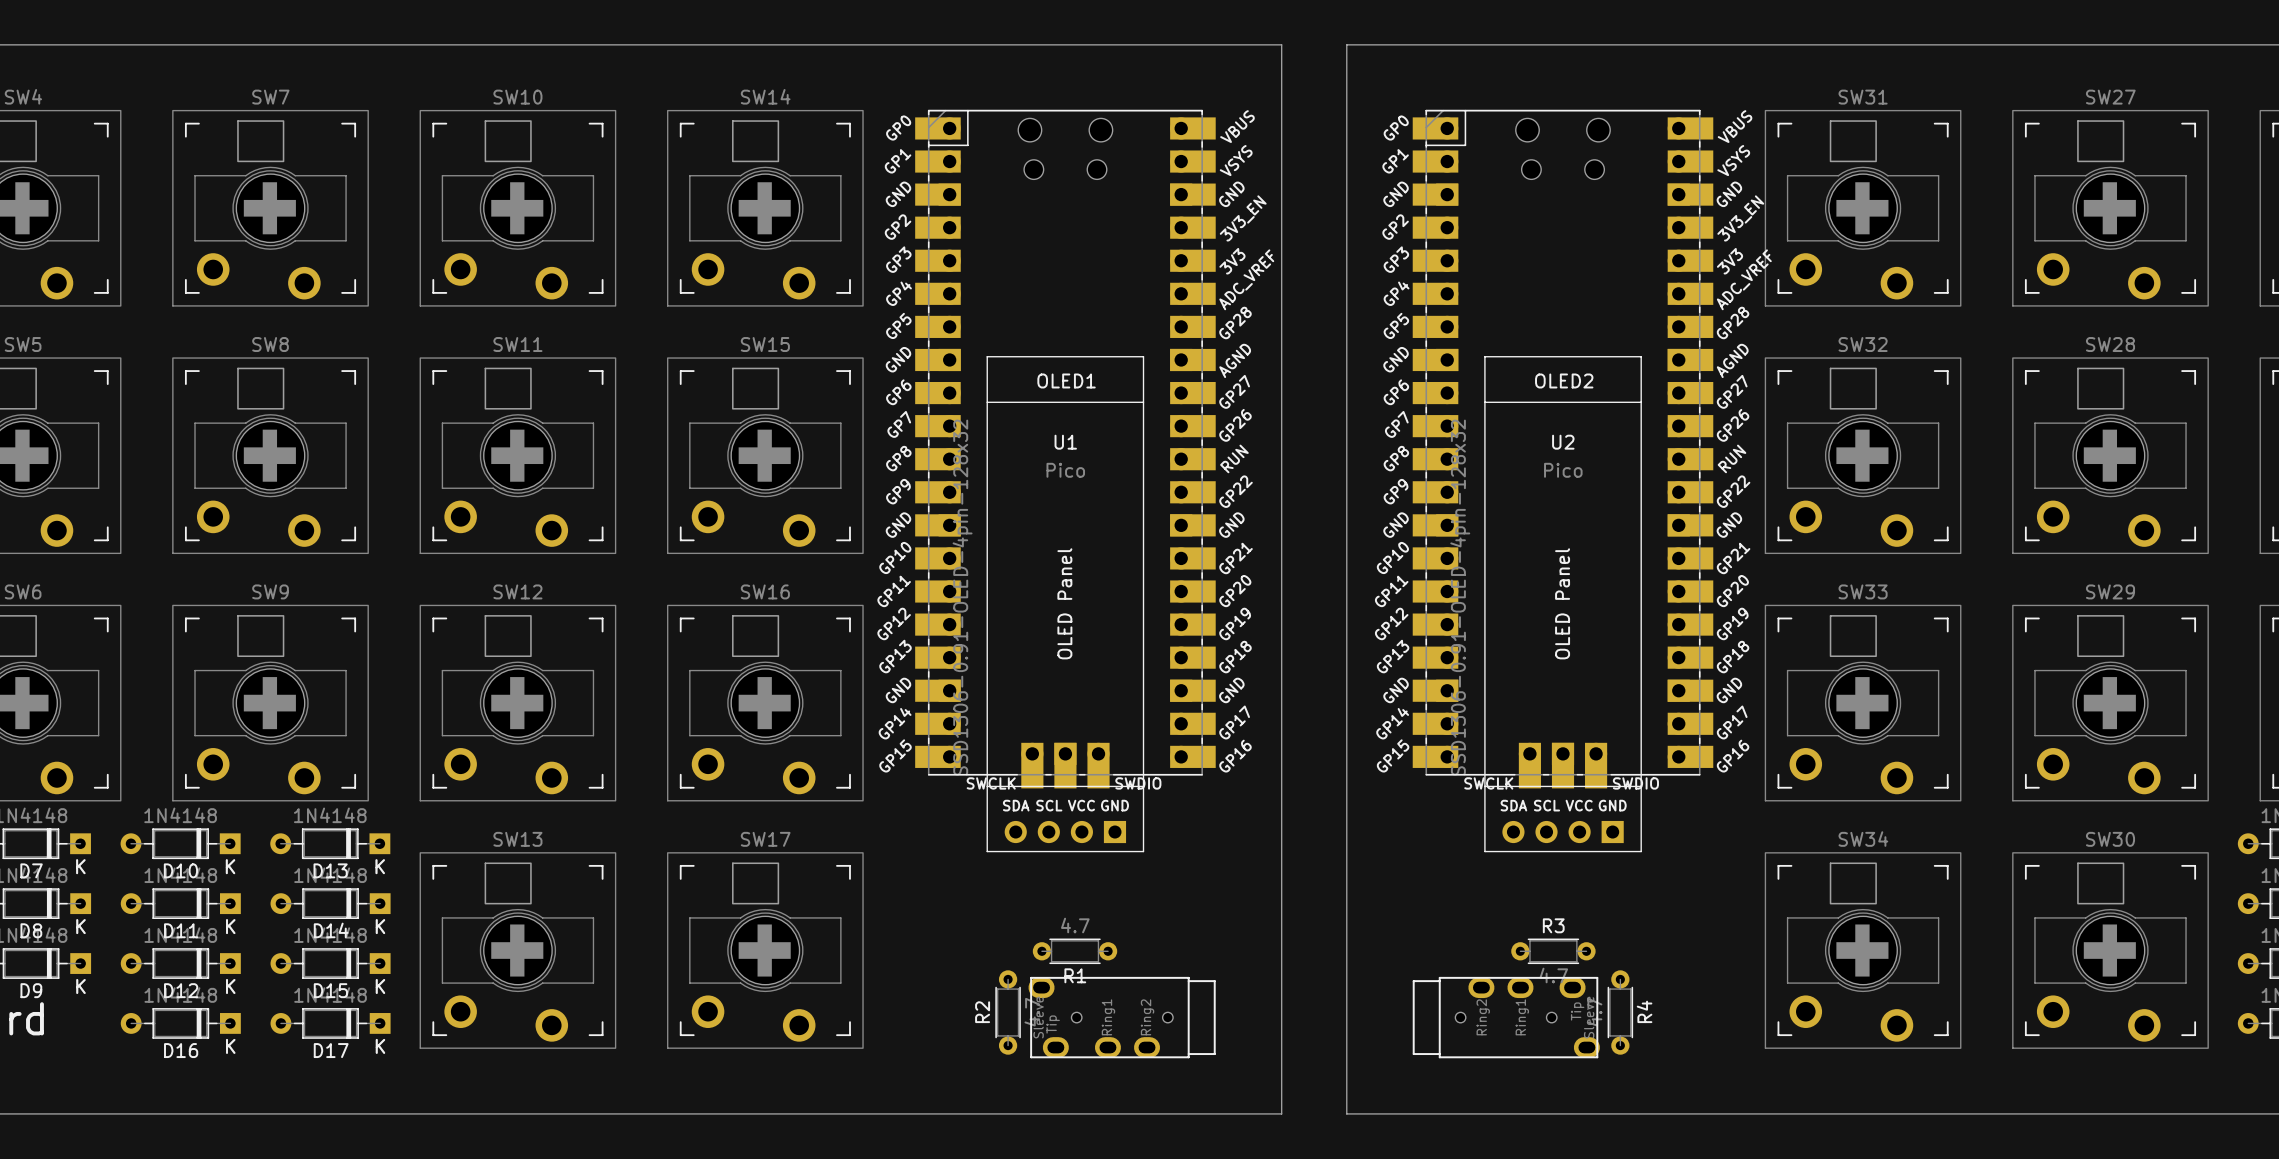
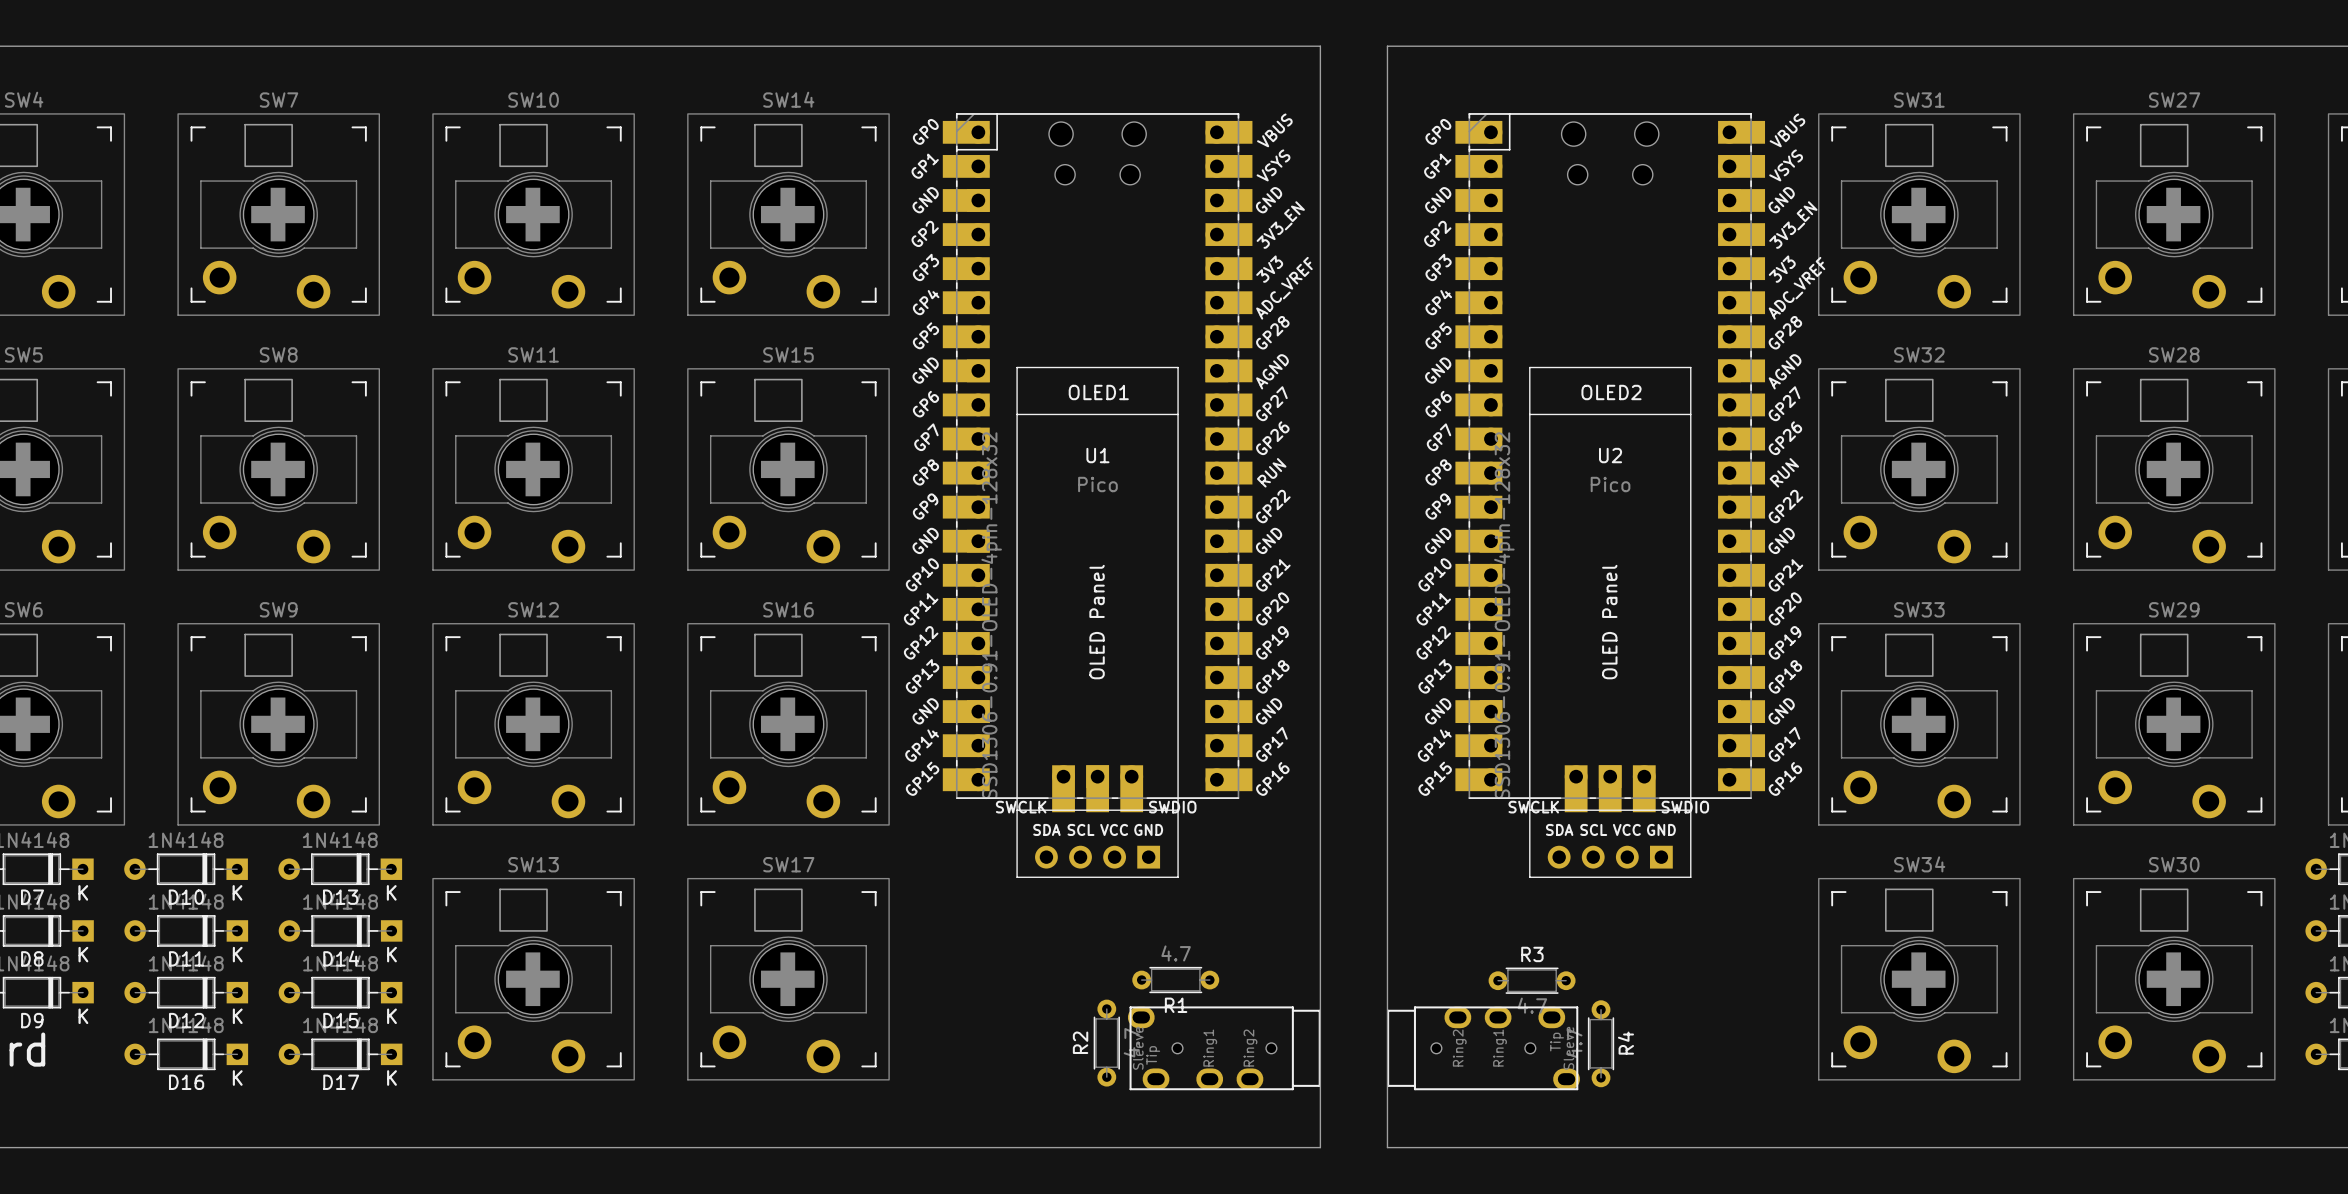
R1 position: (1075, 951) -> (1175, 980)
R3 position: (1553, 951) -> (1532, 980)
R2 position: (1008, 1012) -> (1106, 1043)
R4 position: (1620, 1012) -> (1601, 1043)
part position: (1122, 1017) -> (1224, 1048)
part position: (1506, 1017) -> (1483, 1048)

